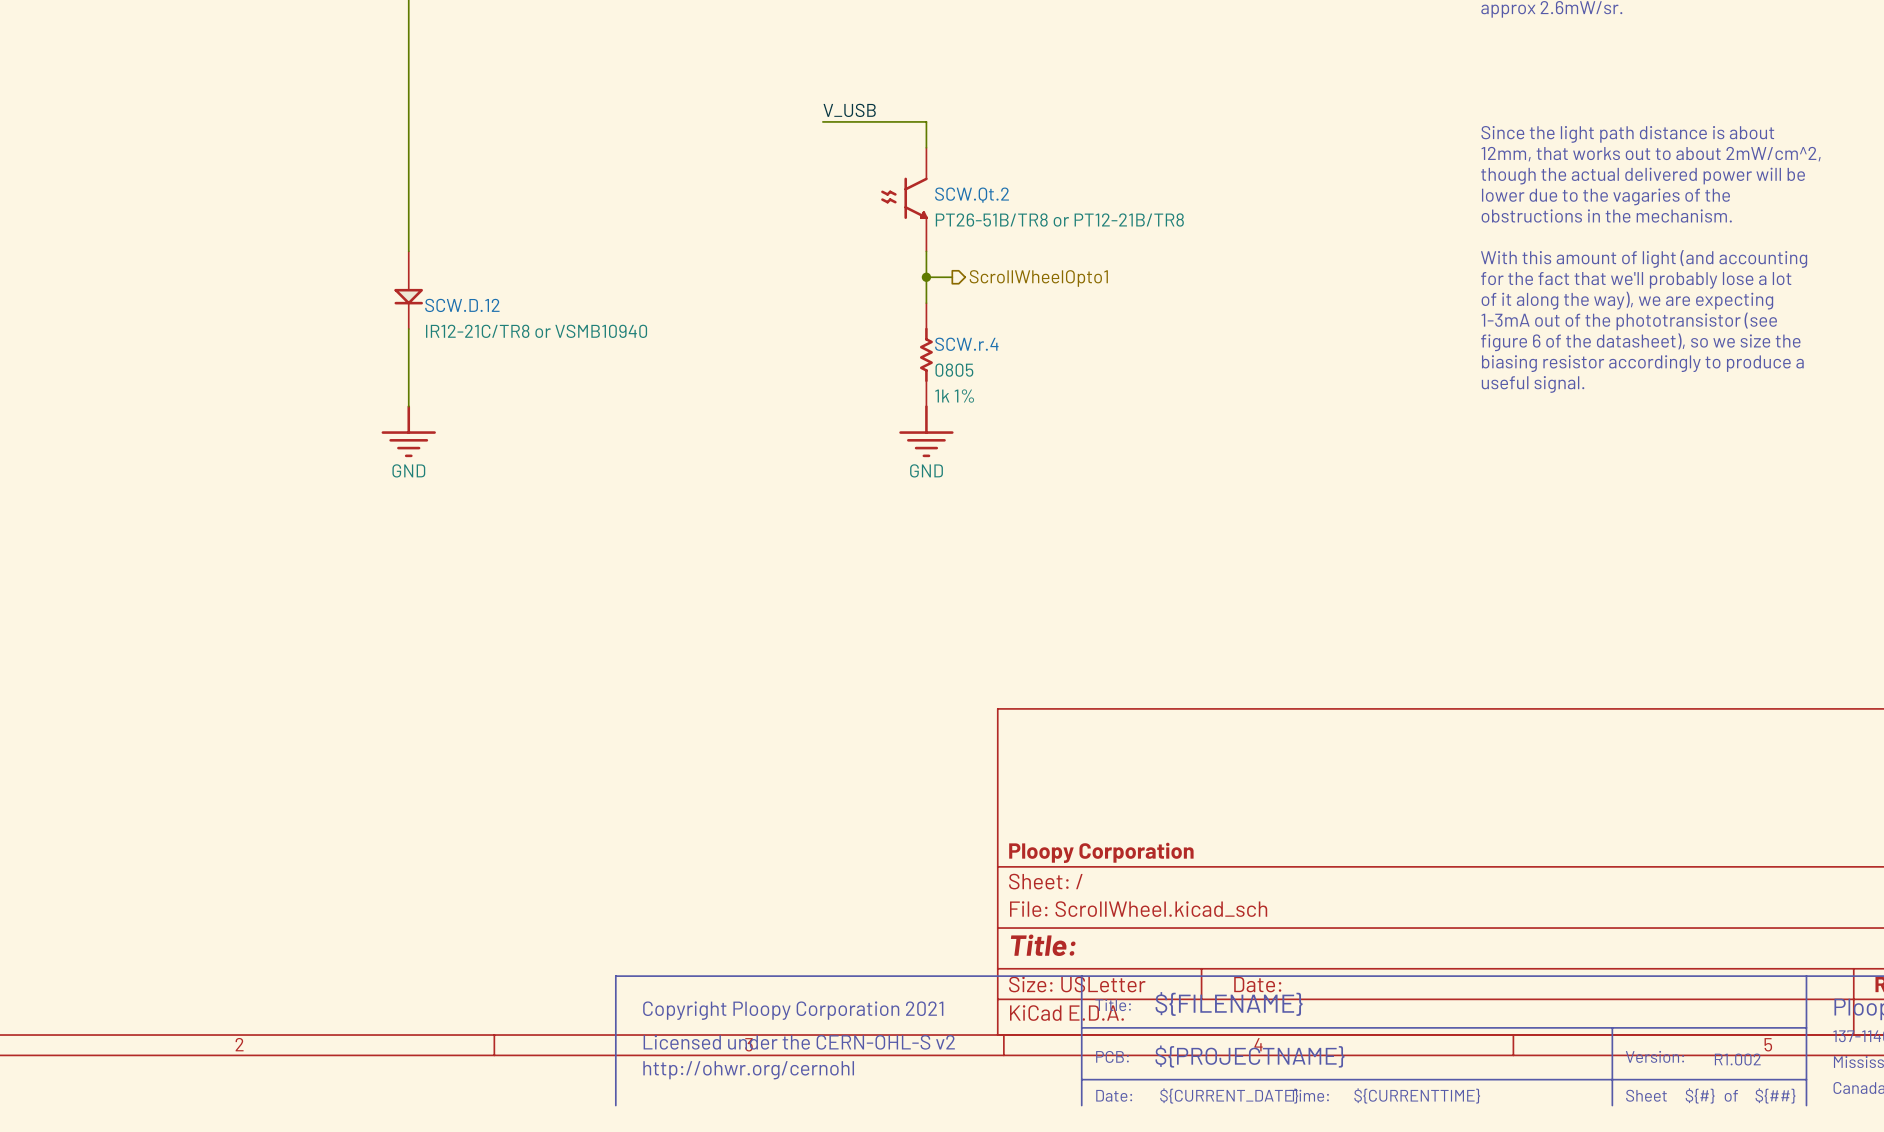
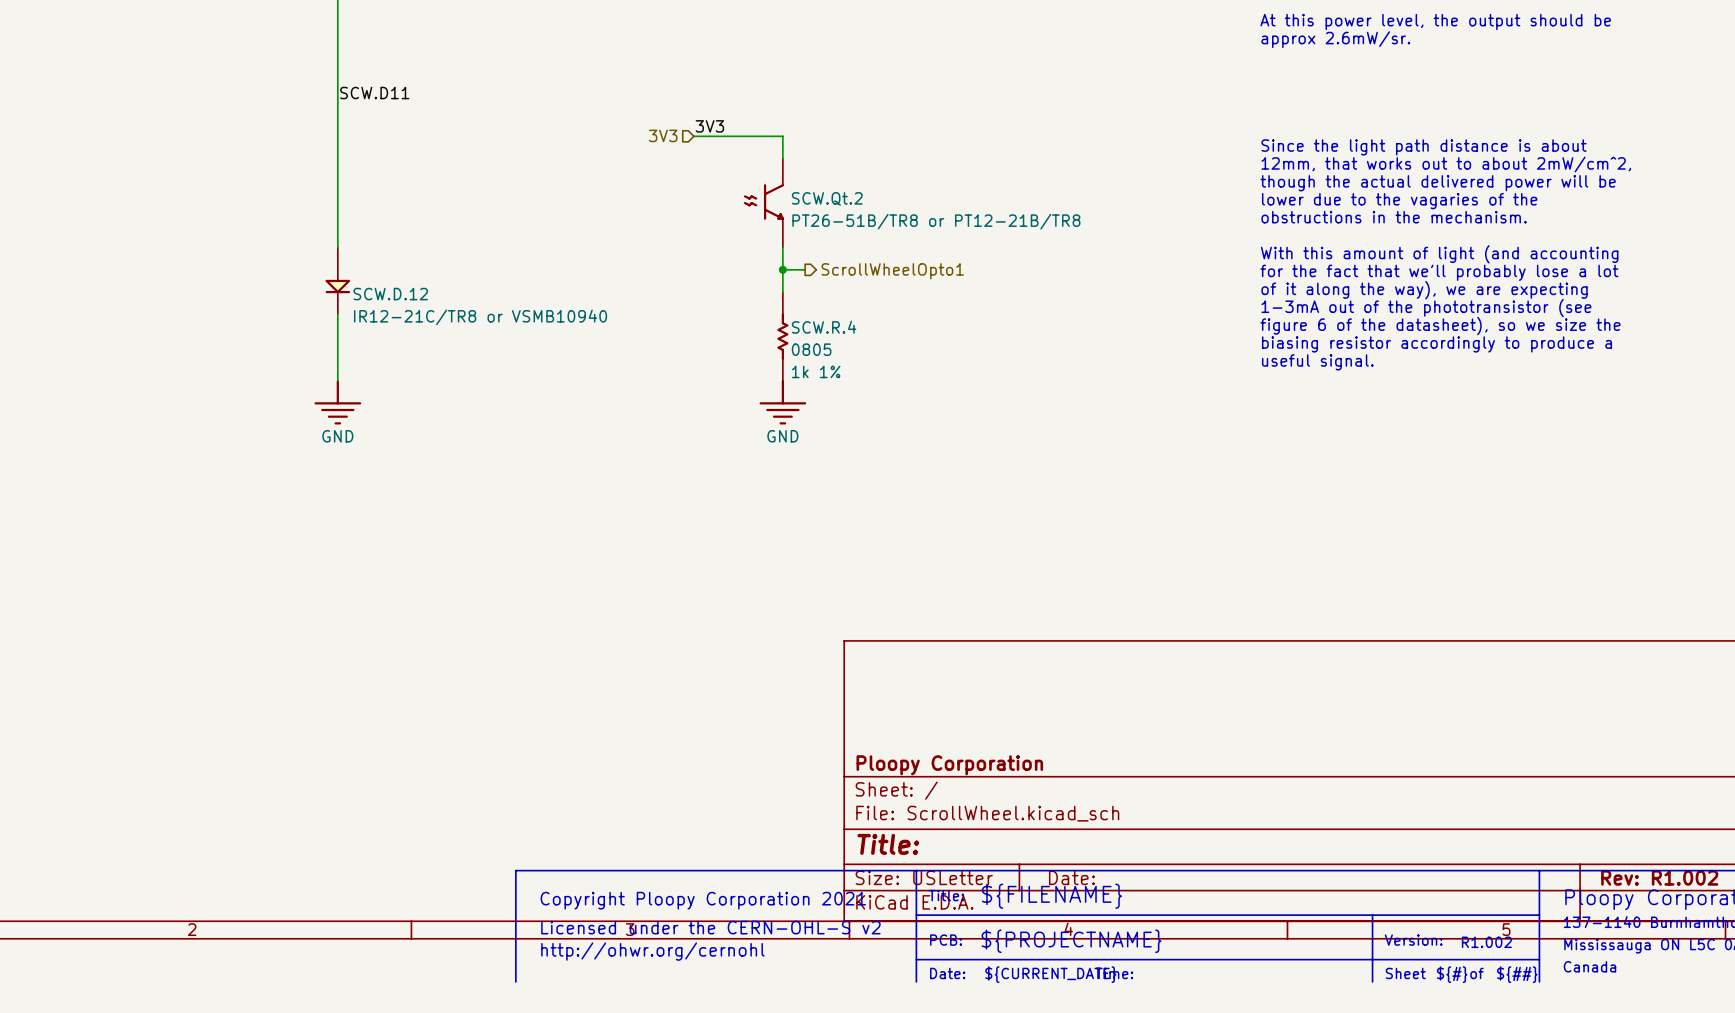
label: none -> SCW.D11 (374, 93)
label: V_USB (849, 110) -> 3V3 (709, 126)
hierarchical label: none -> 3V3 (663, 135)
SCW.r.4 name: SCW.r.4 (966, 344) -> SCW.R.4 (824, 327)
text: ${CURRENTTIME} (1417, 1095) -> none

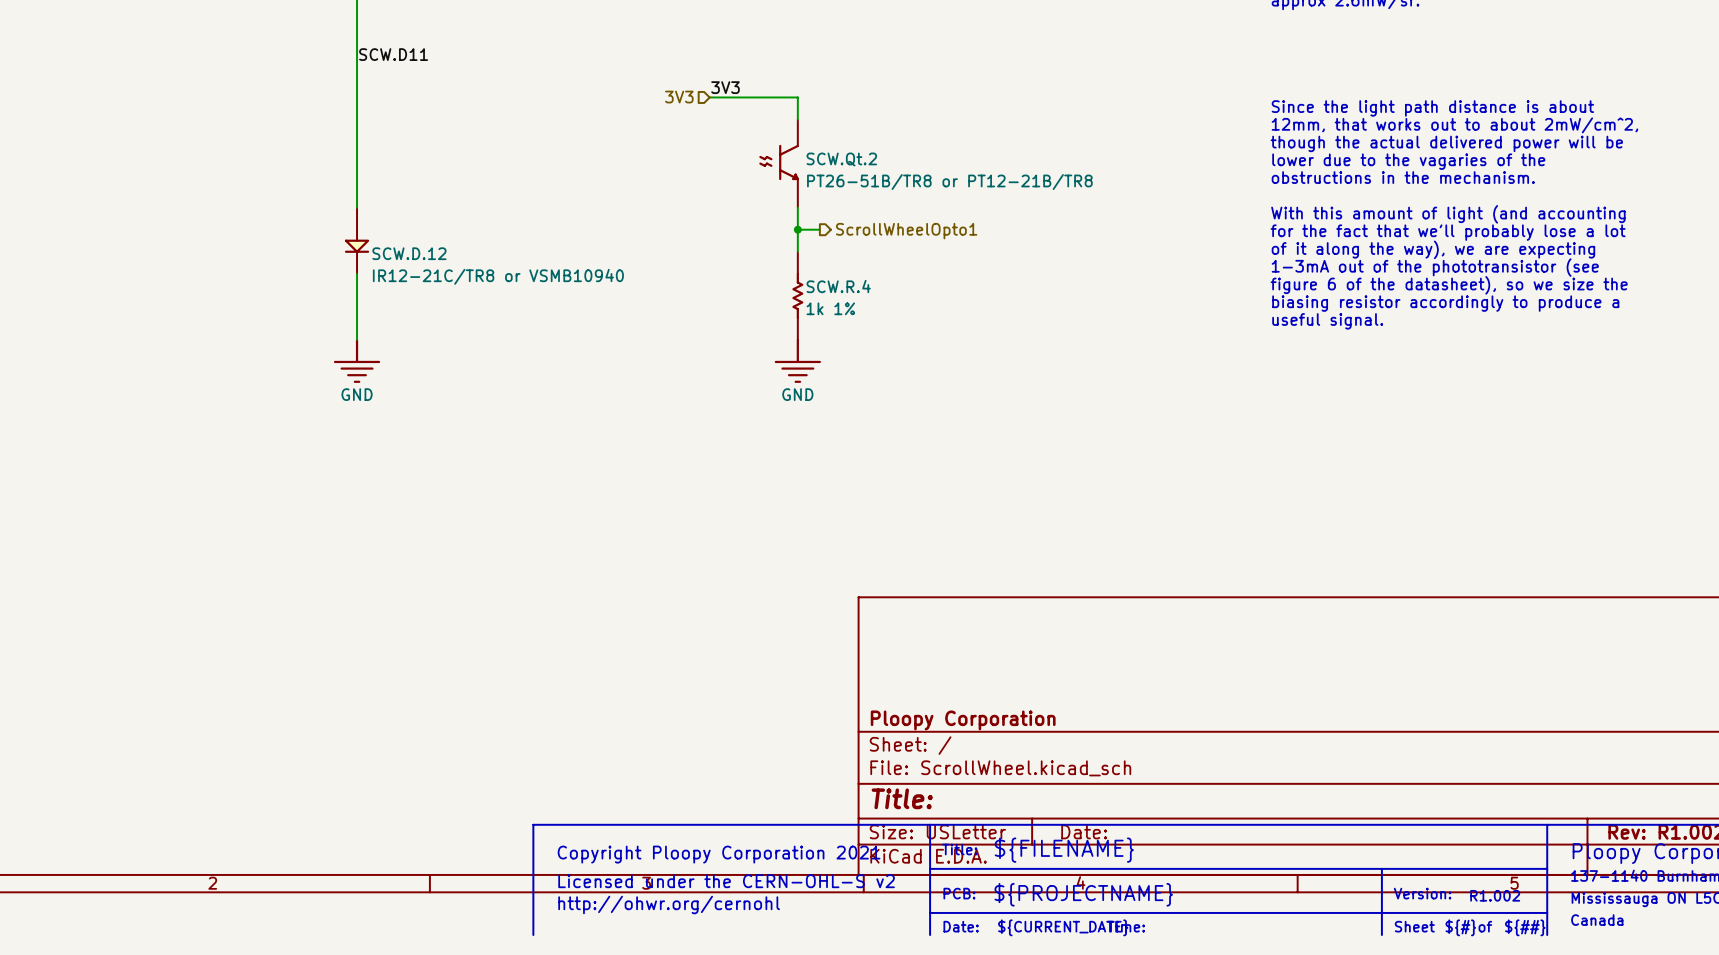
SCW.R.4 value: 0805 (811, 349) -> 1k 1% (830, 308)
SCW.R.4 text: 1k 1% (816, 371) -> none

